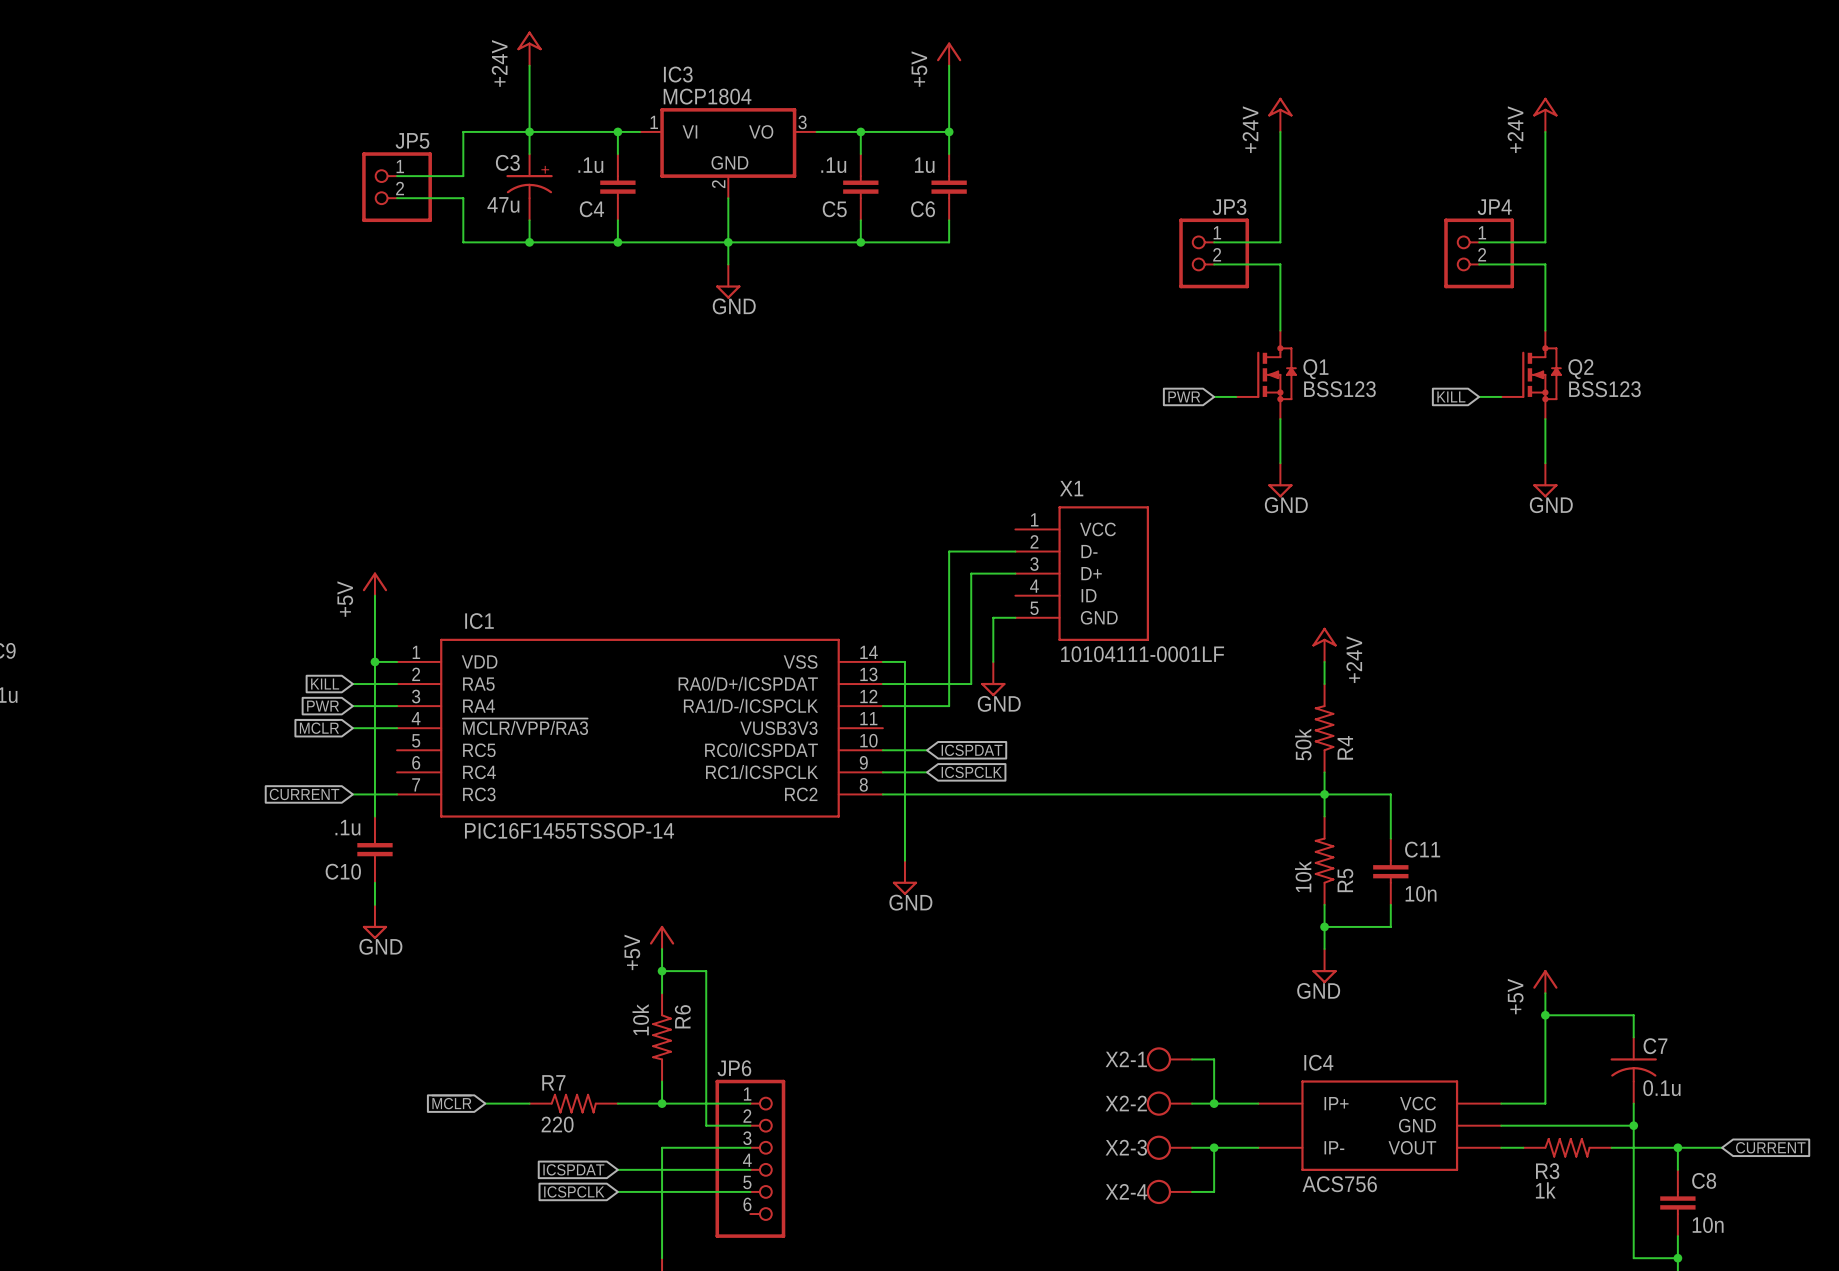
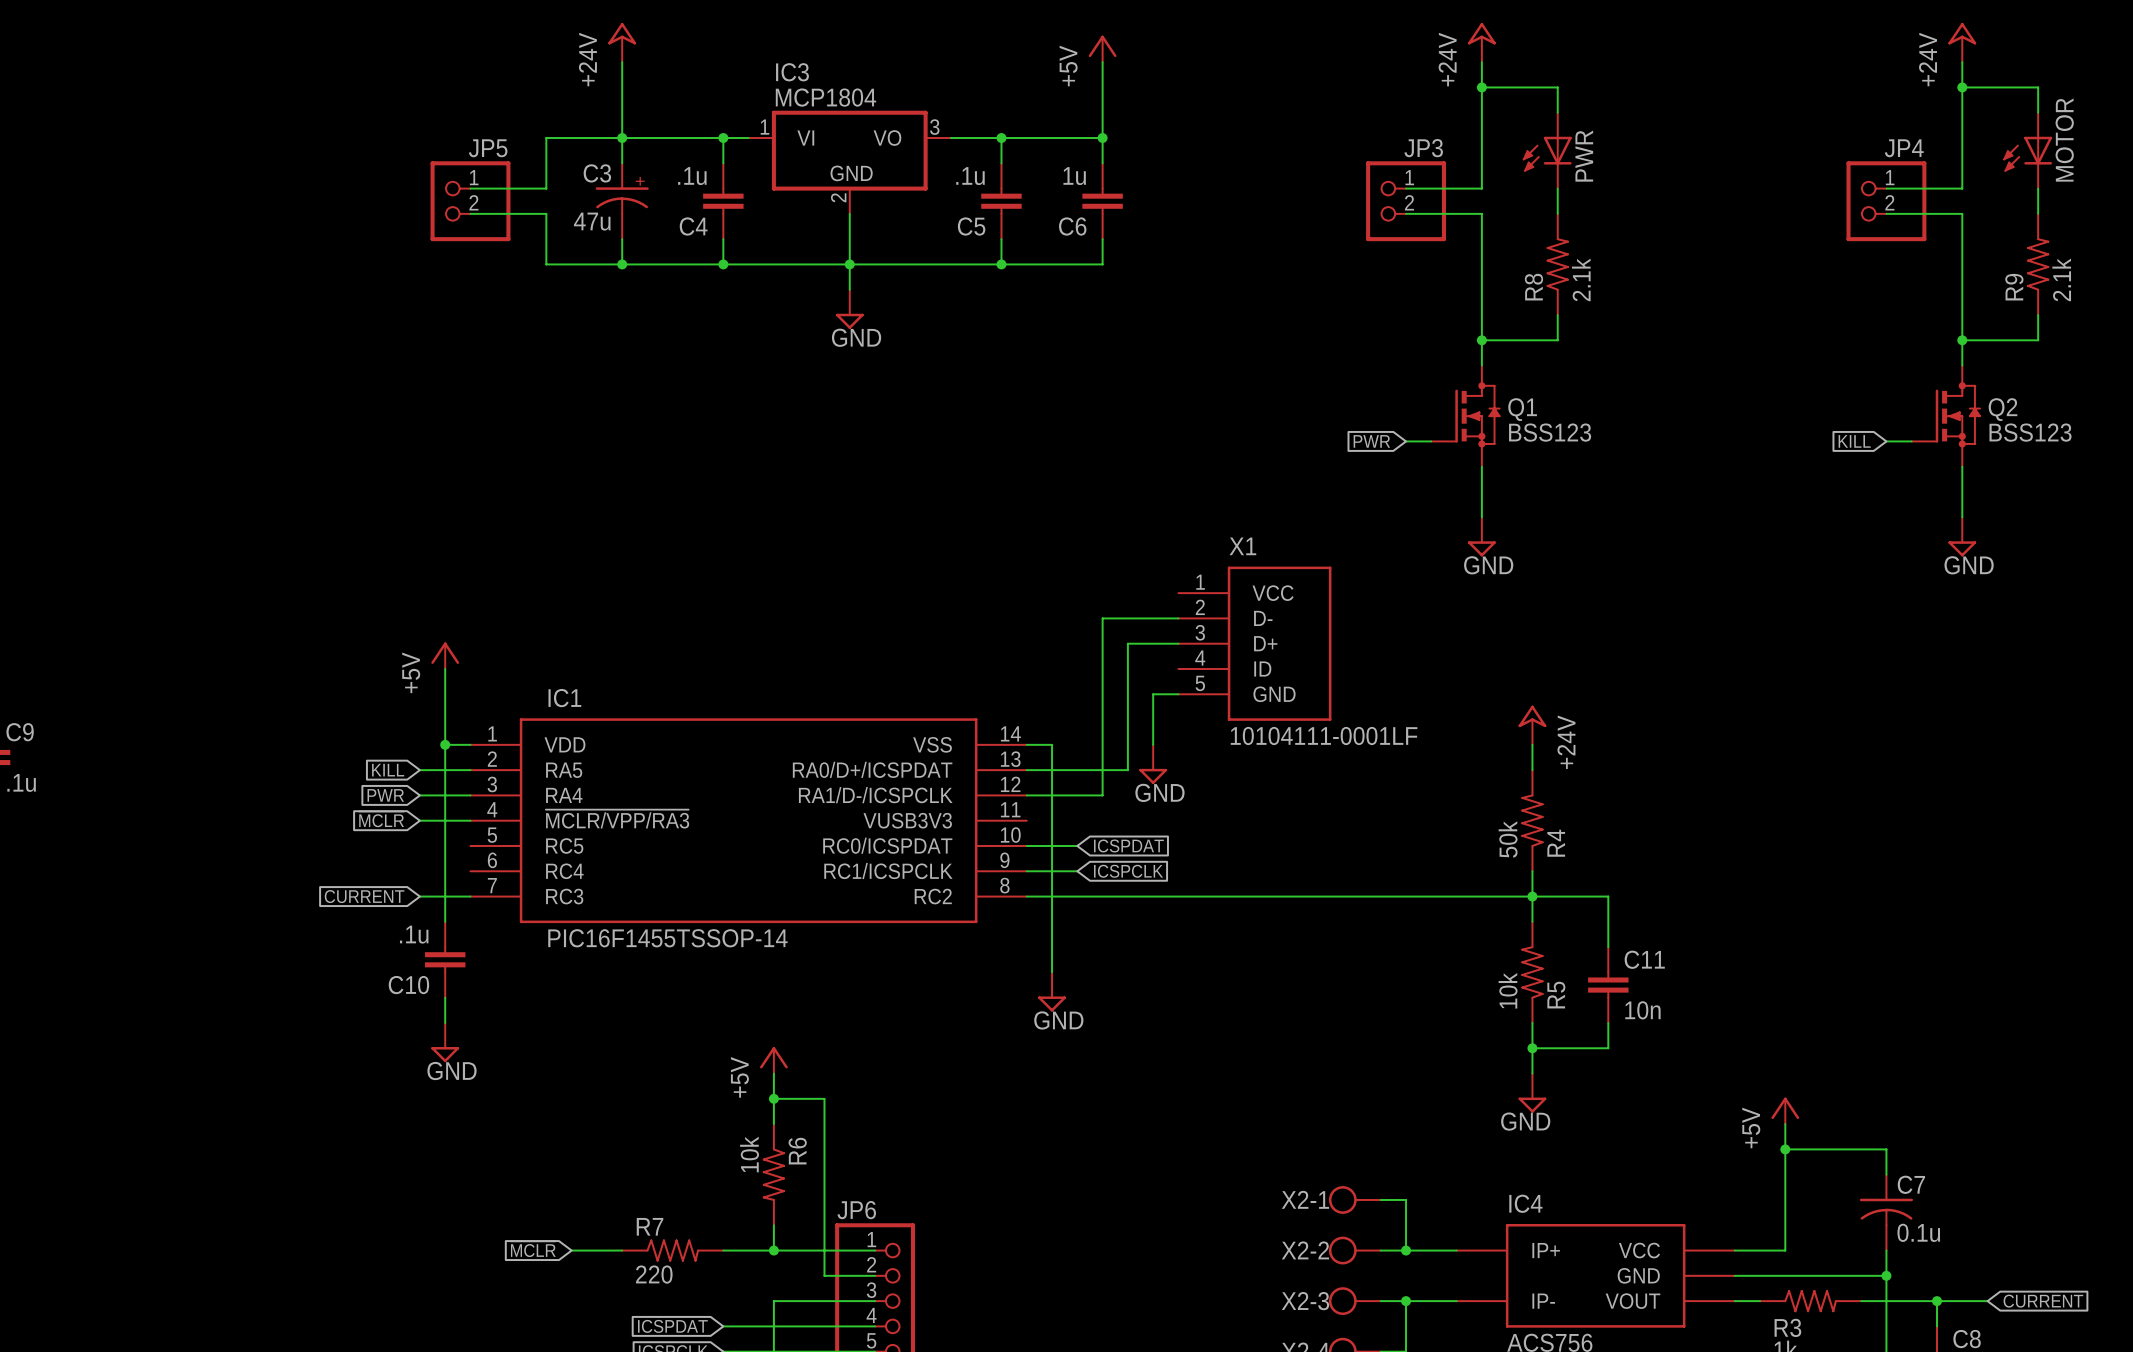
power symbol: none -> +24V (1962, 42)
wire: none -> (1481, 62) (1481, 138)
wire: none -> (1481, 87) (1557, 87) (1557, 112)
junction: none -> (1481, 87)
wire: none -> (1962, 87) (2038, 87) (2038, 112)
junction: none -> (1962, 87)
power symbol position: +24V (1280, 114) -> +24V (1481, 42)
power symbol: +24V (1545, 114) -> none
wire: (1545, 131) (1545, 242) (1479, 242) -> (1962, 62) (1962, 188) (1886, 188)
PWR: none -> (1547, 150)
MOTOR: none -> (2027, 150)
wire: (1280, 176) (1280, 198) -> (1481, 188) (1406, 188)
wire: none -> (1557, 188) (1557, 213)
wire: none -> (2038, 188) (2038, 213)
wire: none -> (1886, 213) (1962, 213) (1962, 365)
wire: (1214, 242) (1280, 242) -> (1481, 289) (1481, 264)
R8: none -> 2.1k (1557, 264)
R9: none -> 2.1k (2038, 264)
JP3 position: (1214, 253) -> (1406, 201)
JP4 position: (1479, 253) -> (1886, 201)
wire: (1214, 264) (1280, 264) -> (1406, 213) (1481, 213)
wire: (1479, 264) (1545, 264) (1545, 330) -> none
wire: none -> (1557, 315) (1557, 340) (1481, 340)
wire: none -> (2038, 315) (2038, 340) (1962, 340)
junction: none -> (1481, 340)
junction: none -> (1962, 340)
Q2 position: (1531, 374) -> (1946, 416)
global label position: KILL (1451, 396) -> KILL (1854, 441)
wire: (1479, 396) (1501, 396) -> (1886, 441) (1911, 441)
wire: (1545, 419) (1545, 463) -> (1962, 466) (1962, 517)
power symbol position: GND (1545, 480) -> GND (1962, 536)

